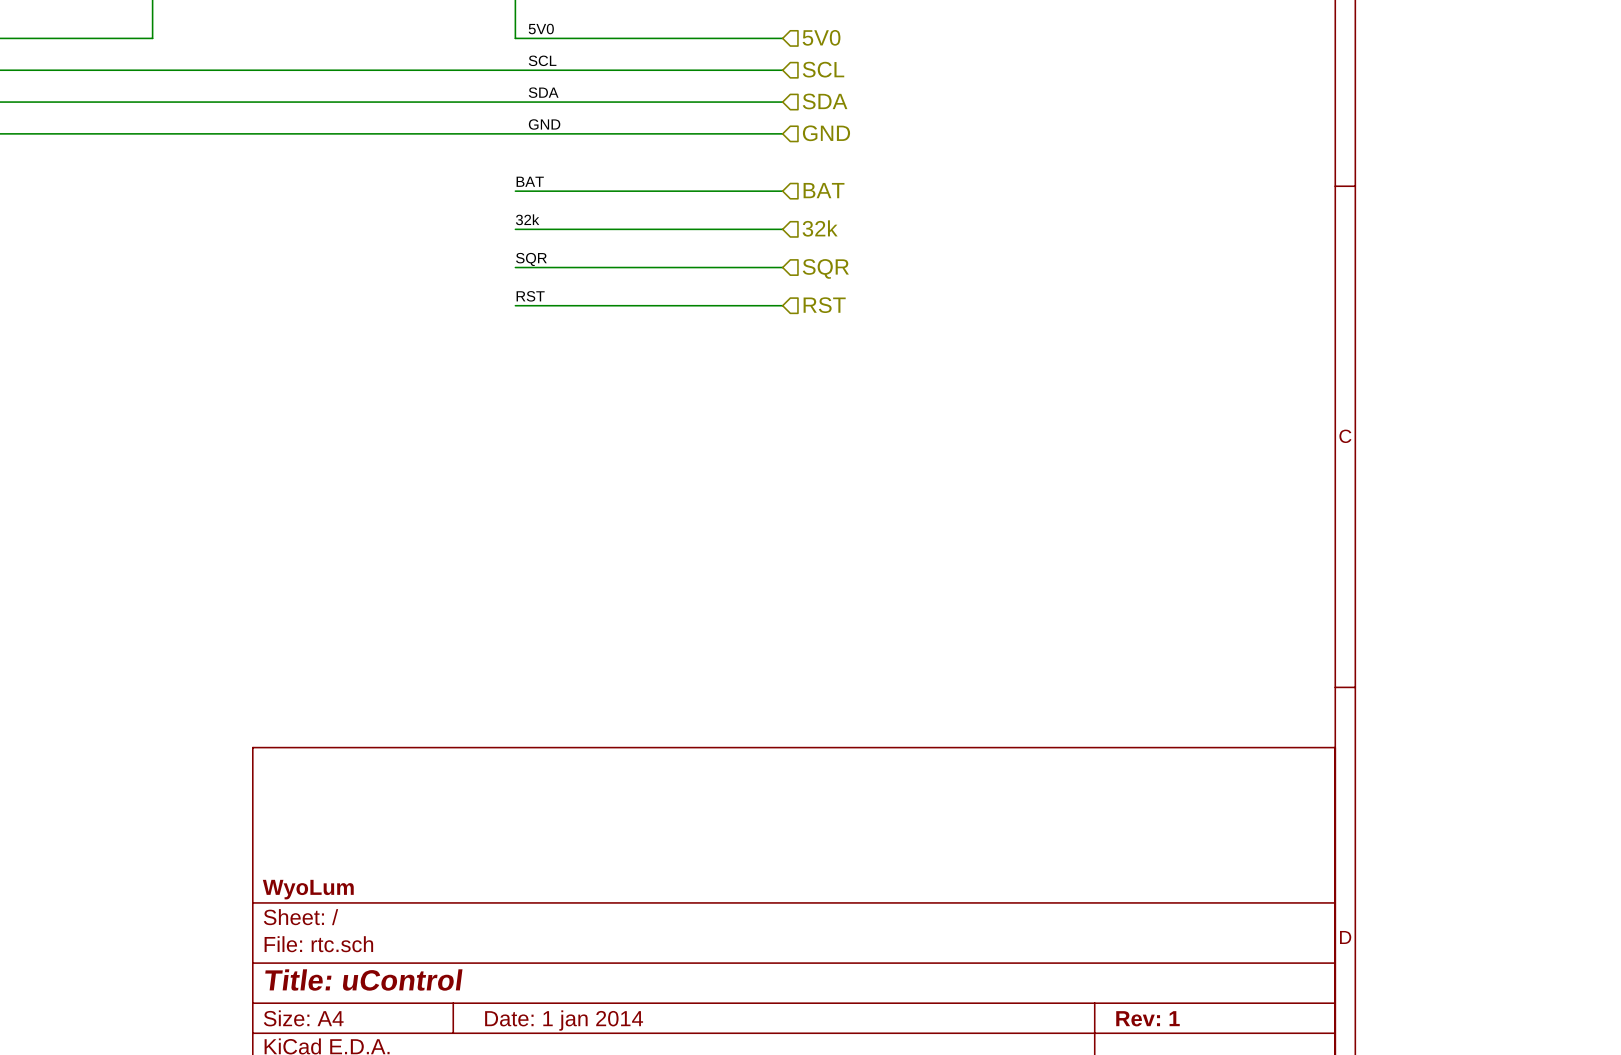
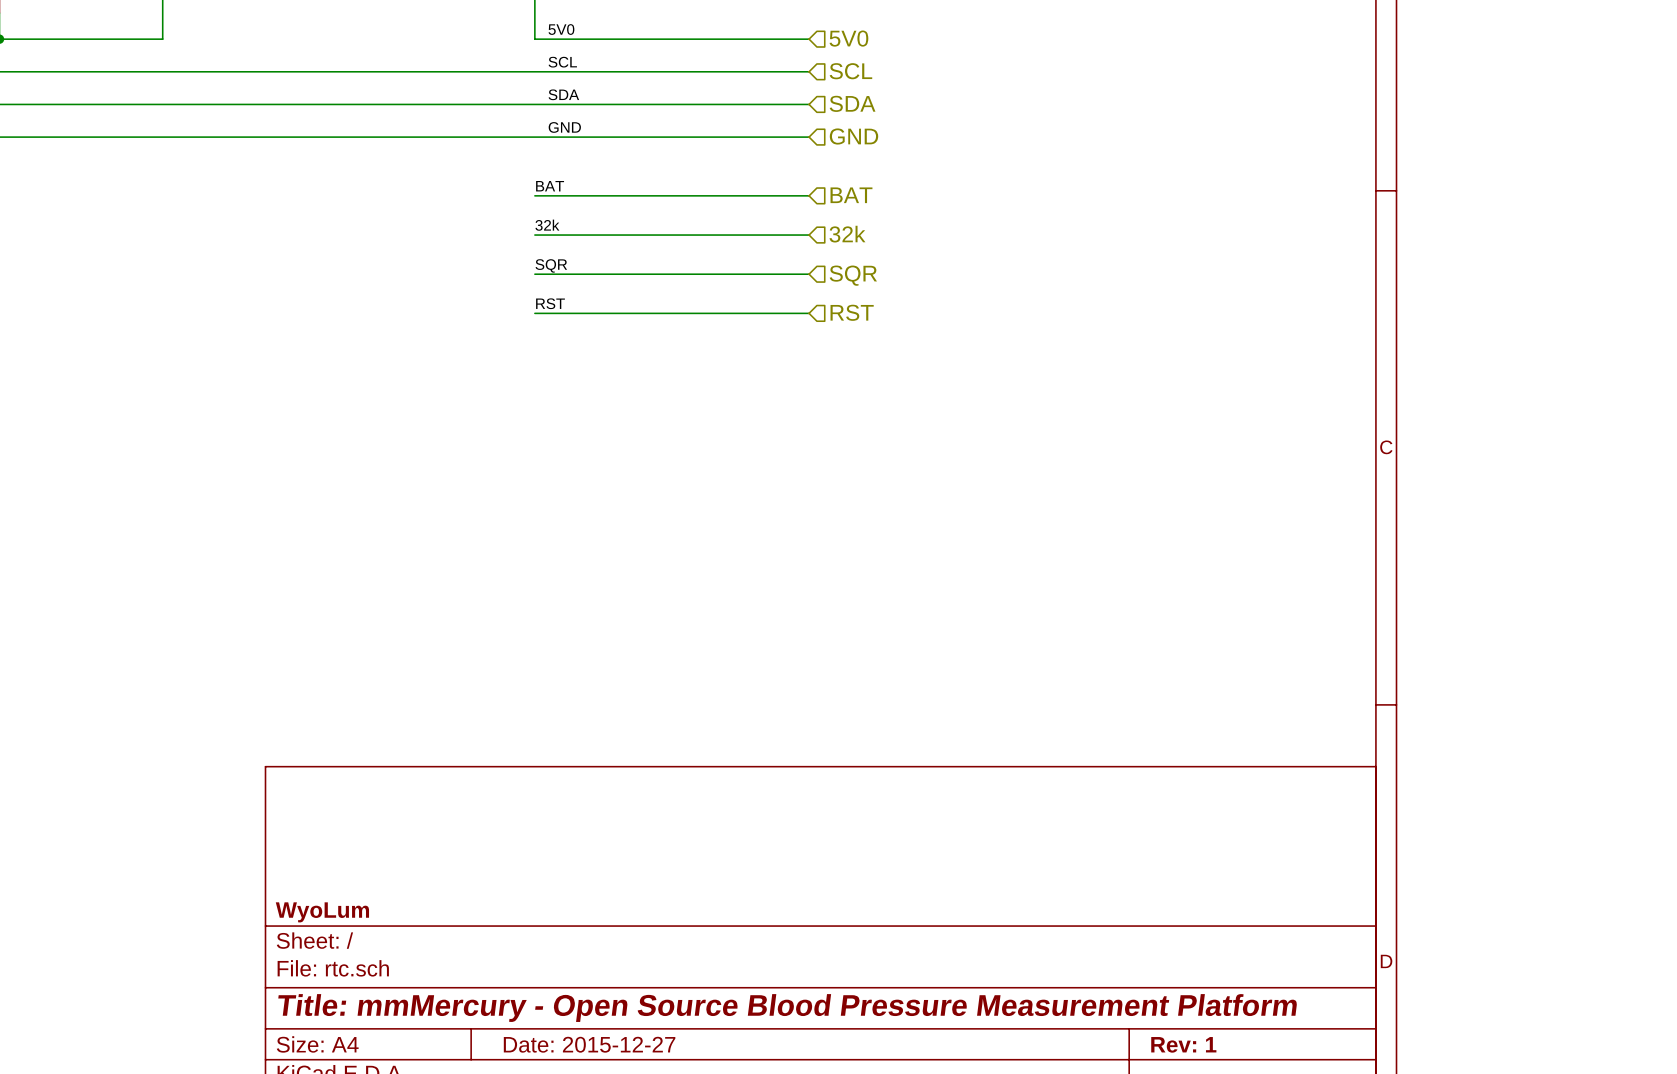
title block: Title: uControl (363, 979) -> Title: mmMercury - Open Source Blood Pressure Measurement Platform (787, 1008)
title block: Date: 1 jan 2014 (564, 1020) -> Date: 2015-12-27 (589, 1044)

